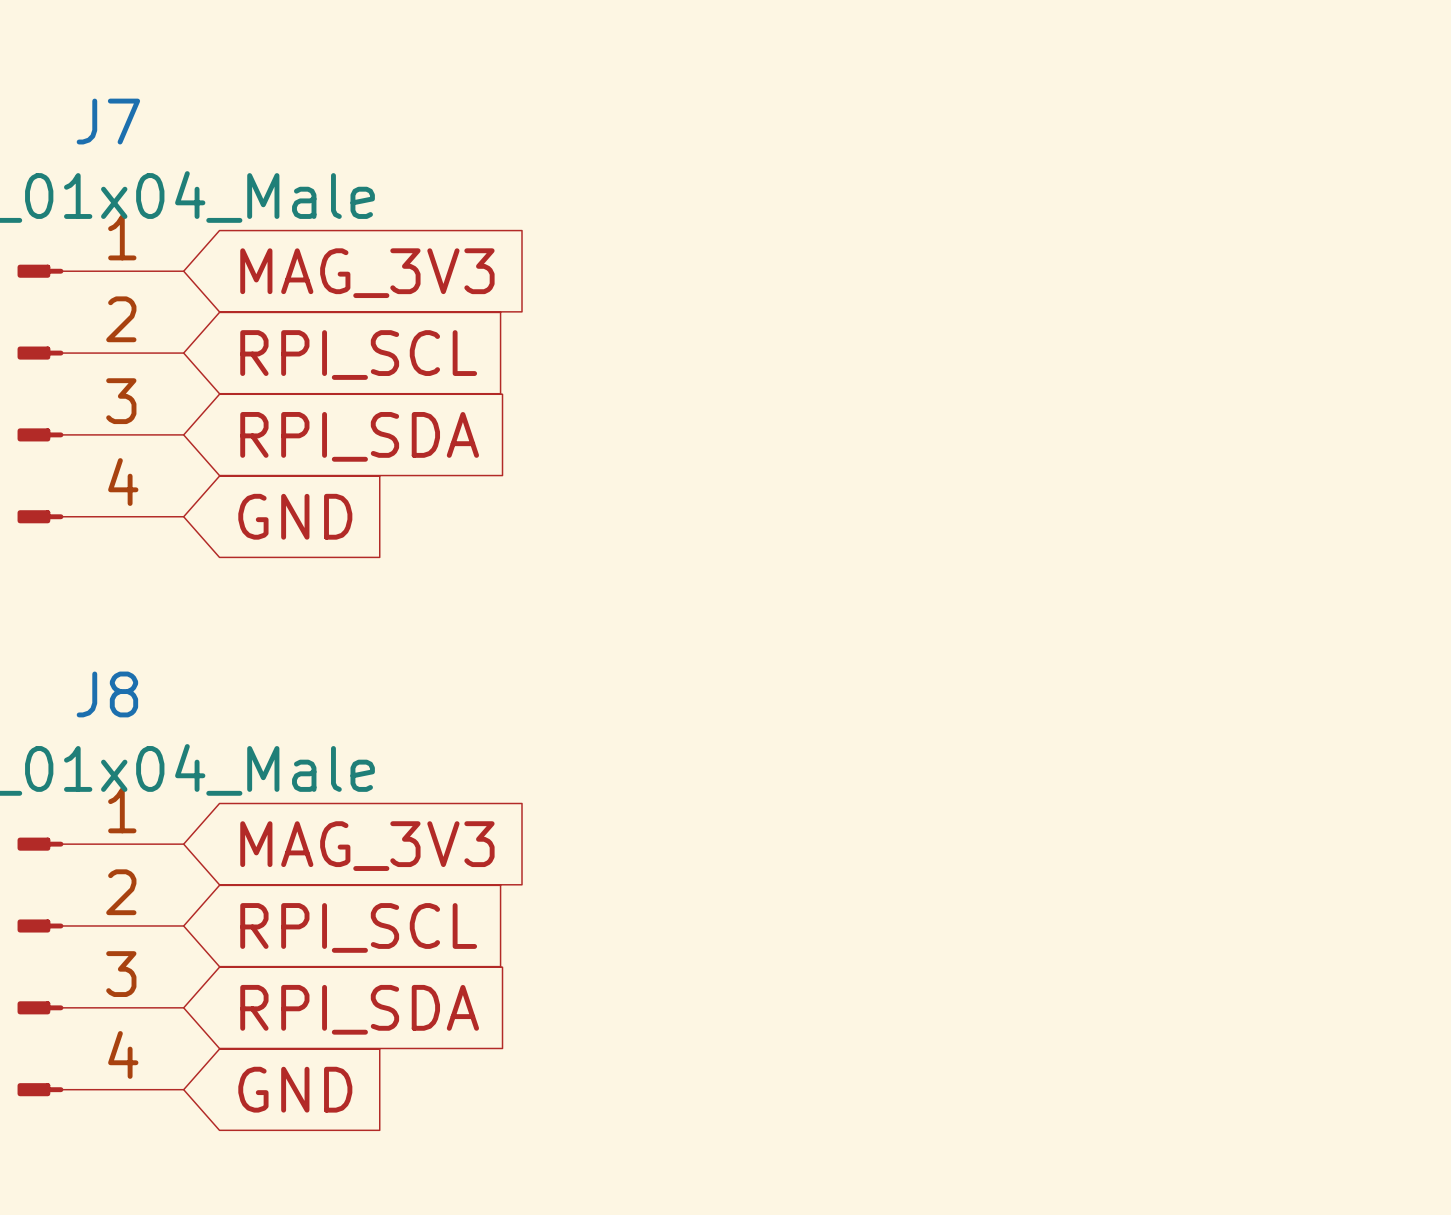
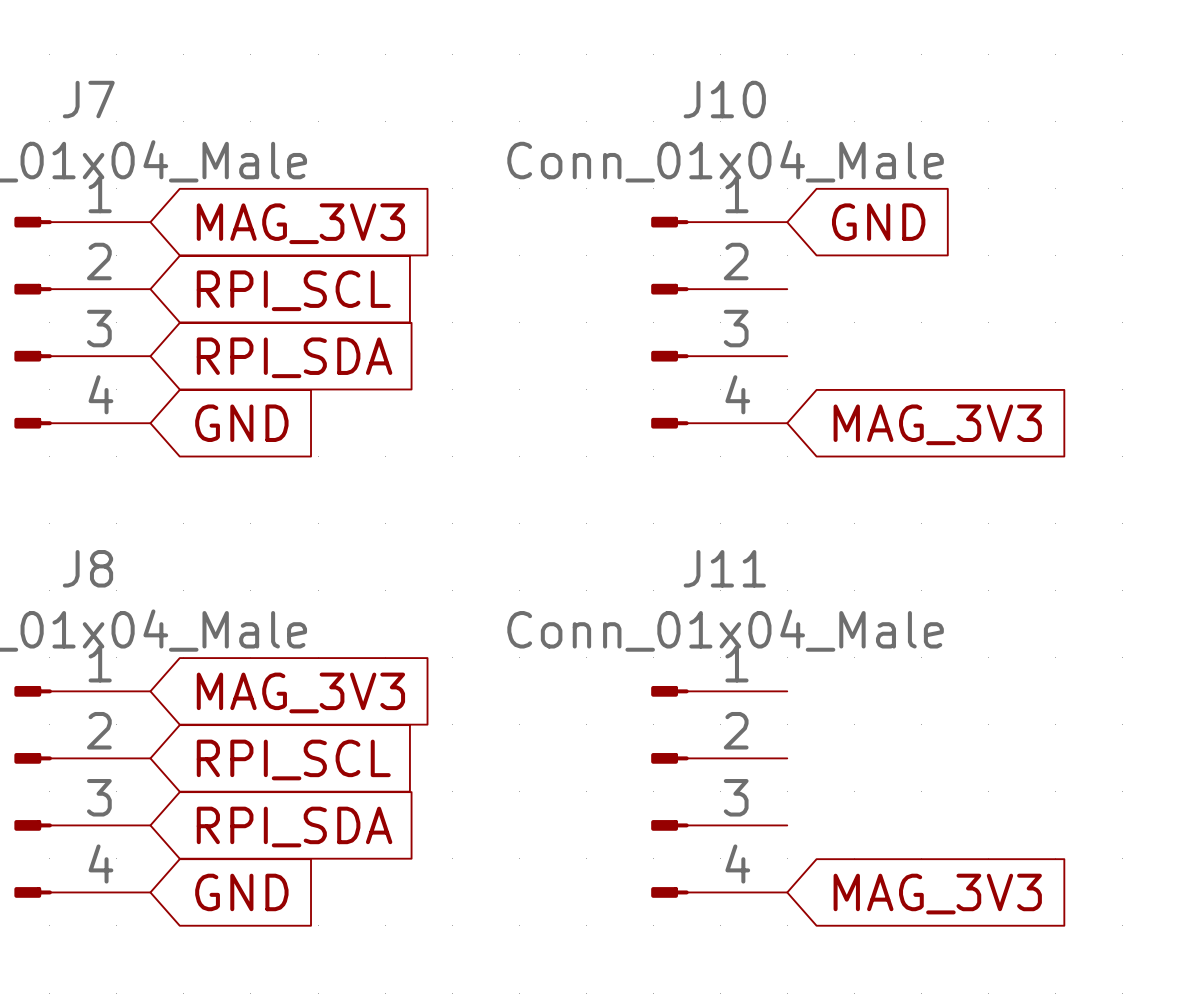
global label: none -> GND (878, 222)
J10: none -> Conn_01x04_Male (719, 322)
global label: none -> MAG_3V3 (937, 424)
J11: none -> Conn_01x04_Male (719, 791)
global label: none -> MAG_3V3 (937, 894)

